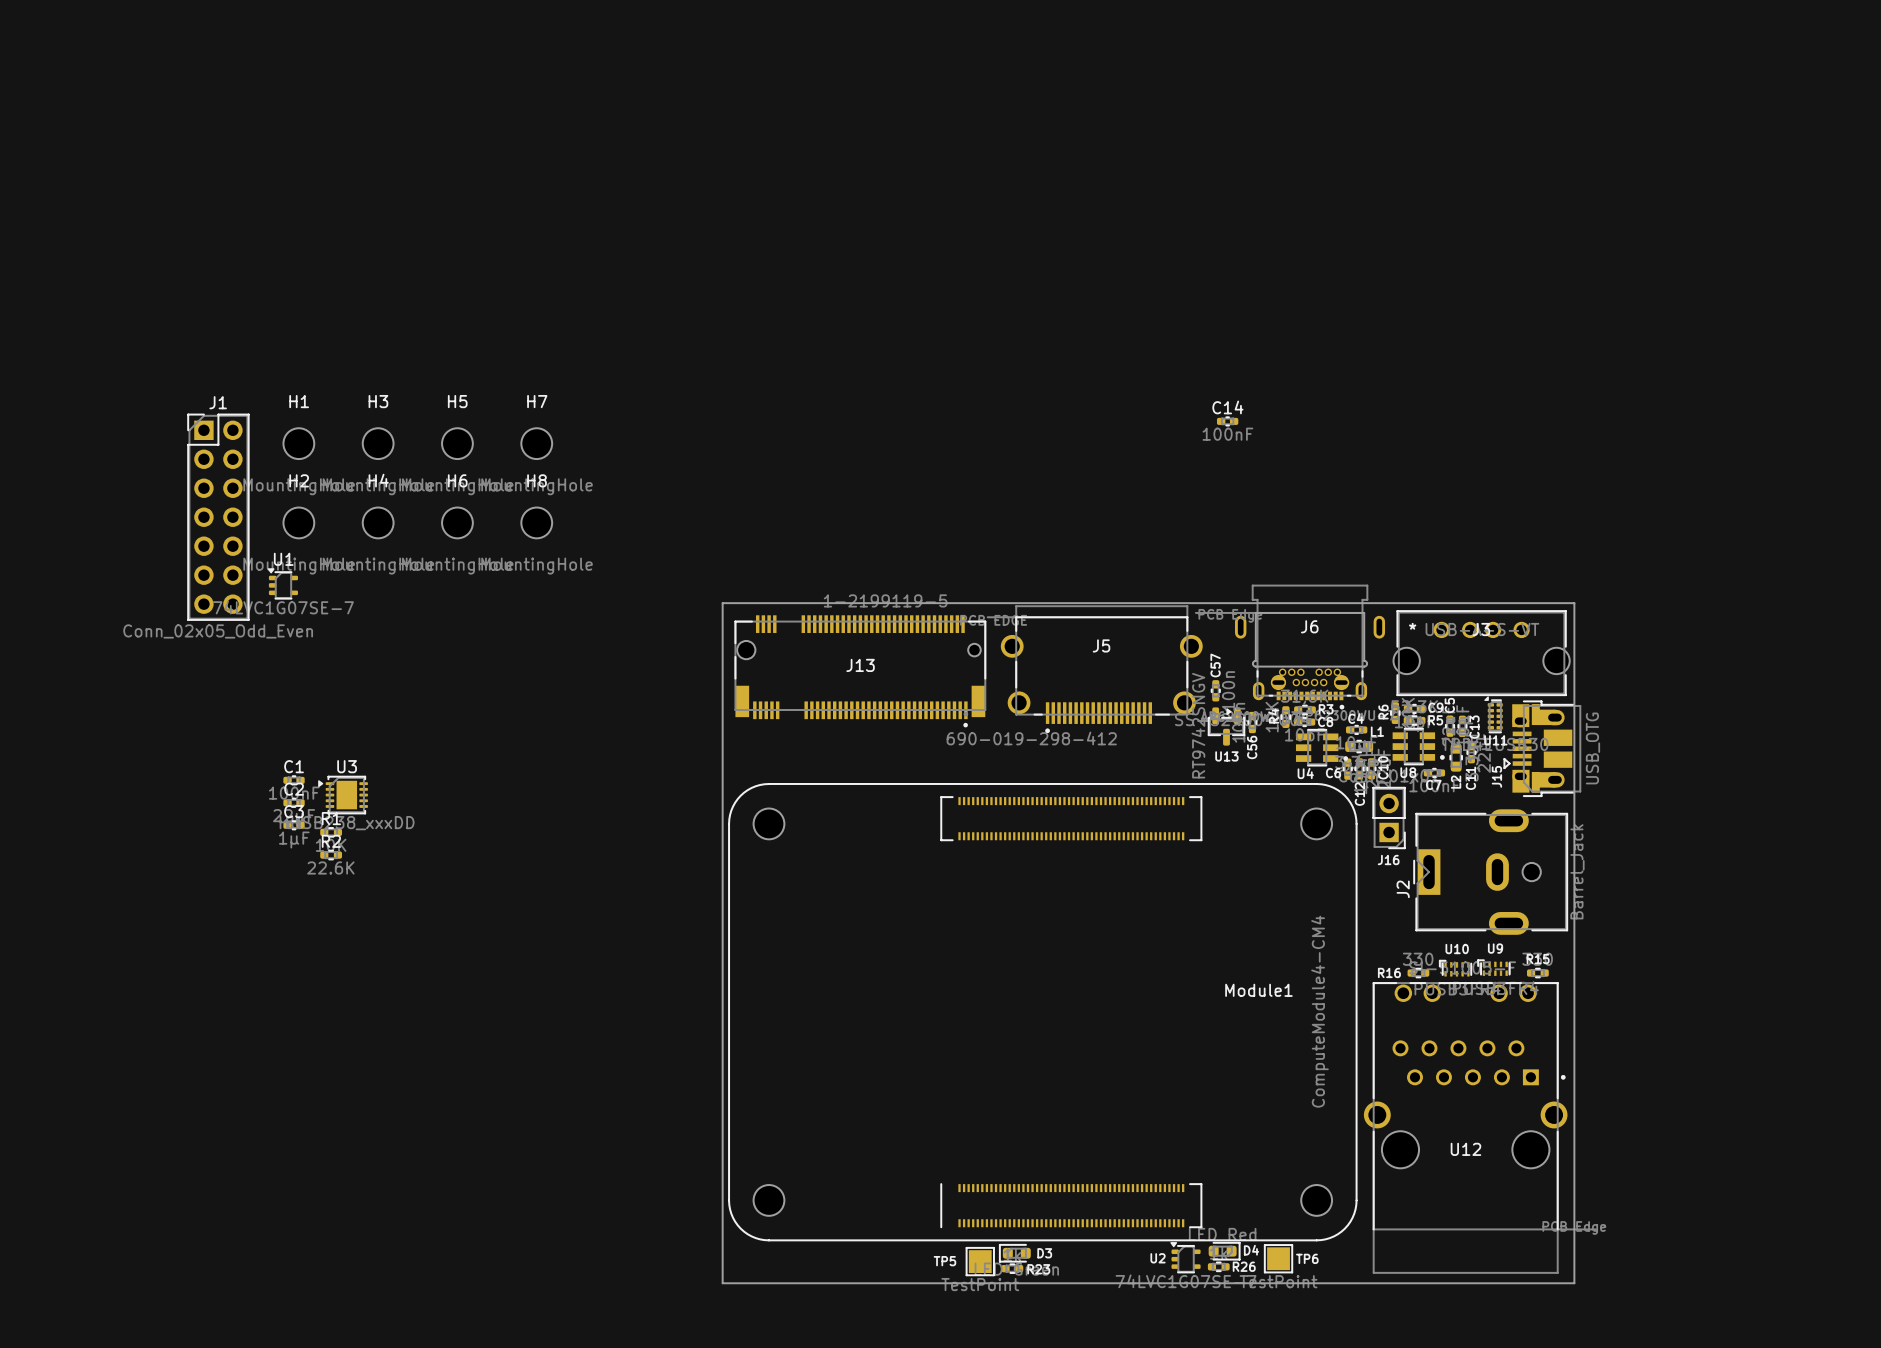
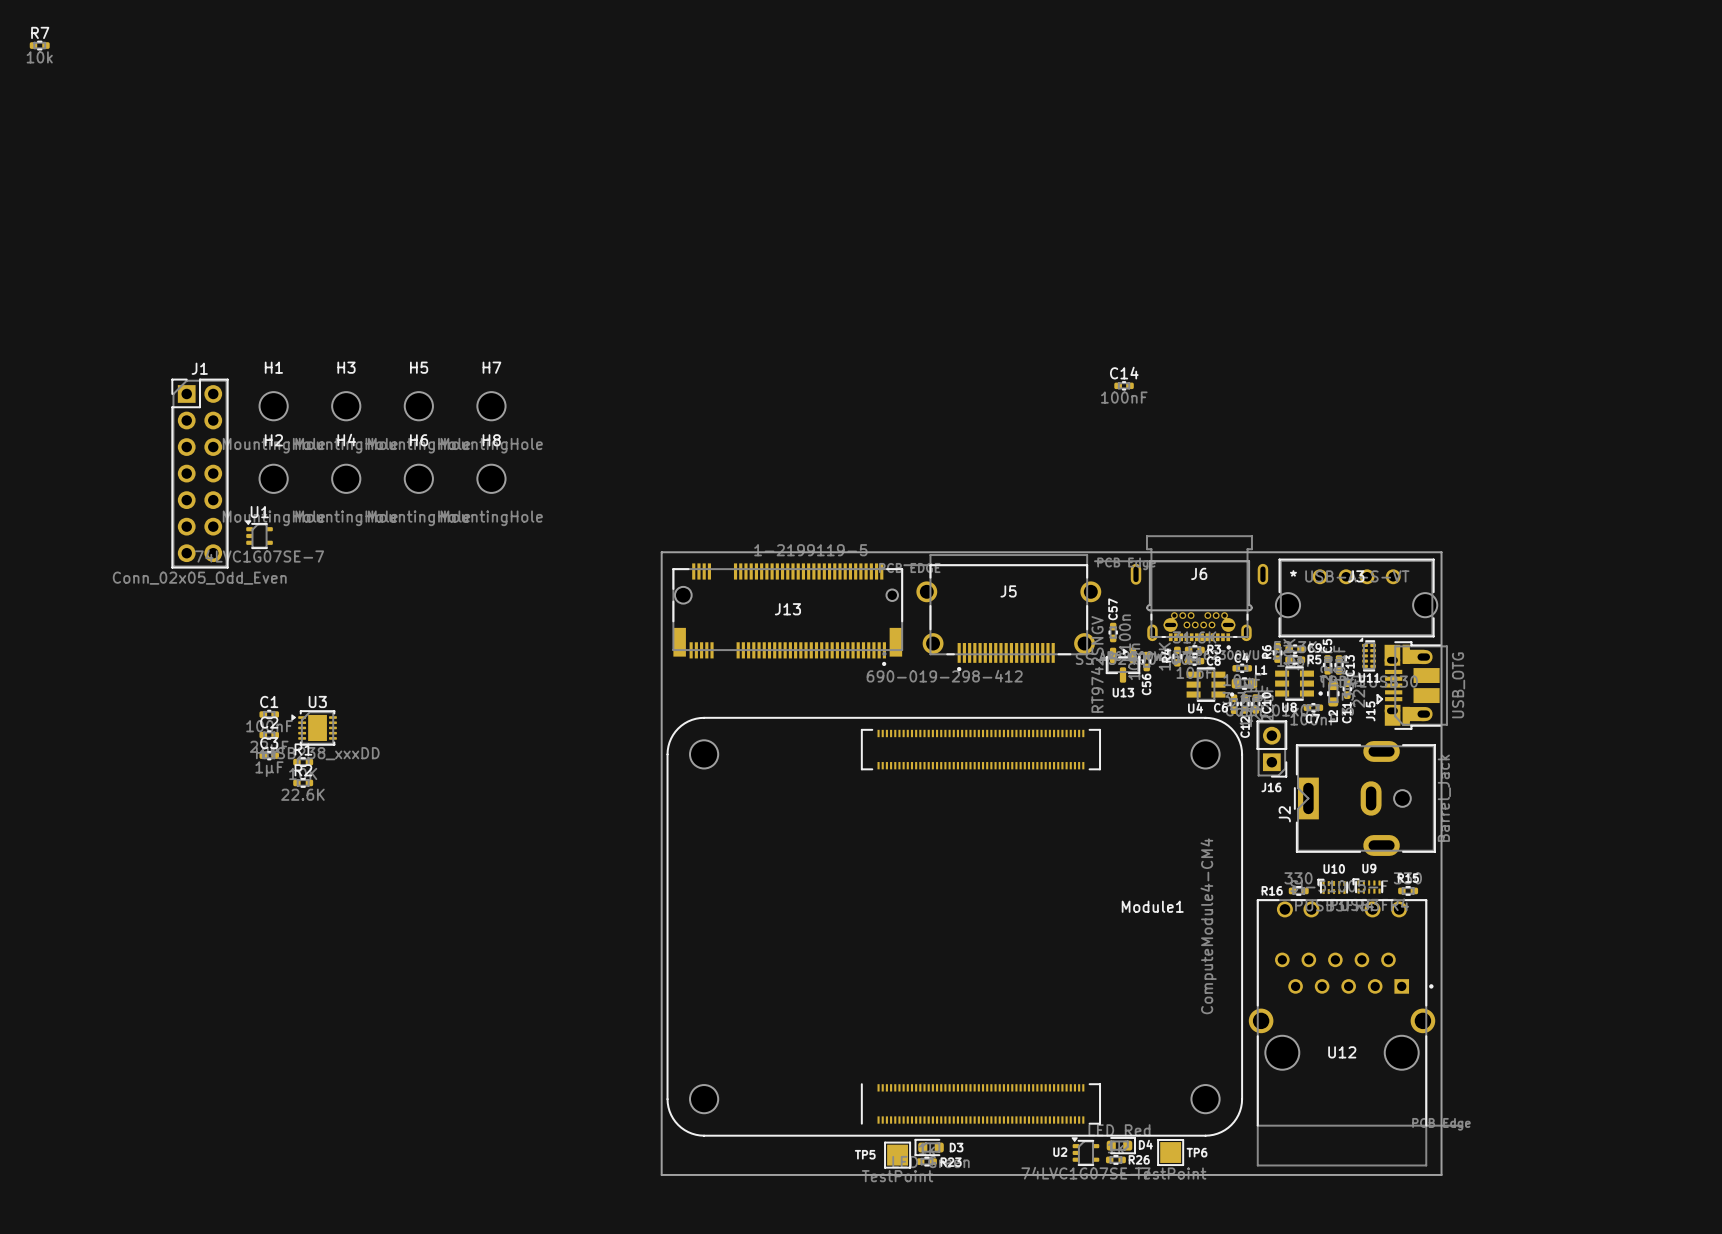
R7: none -> 10k (39, 45)

